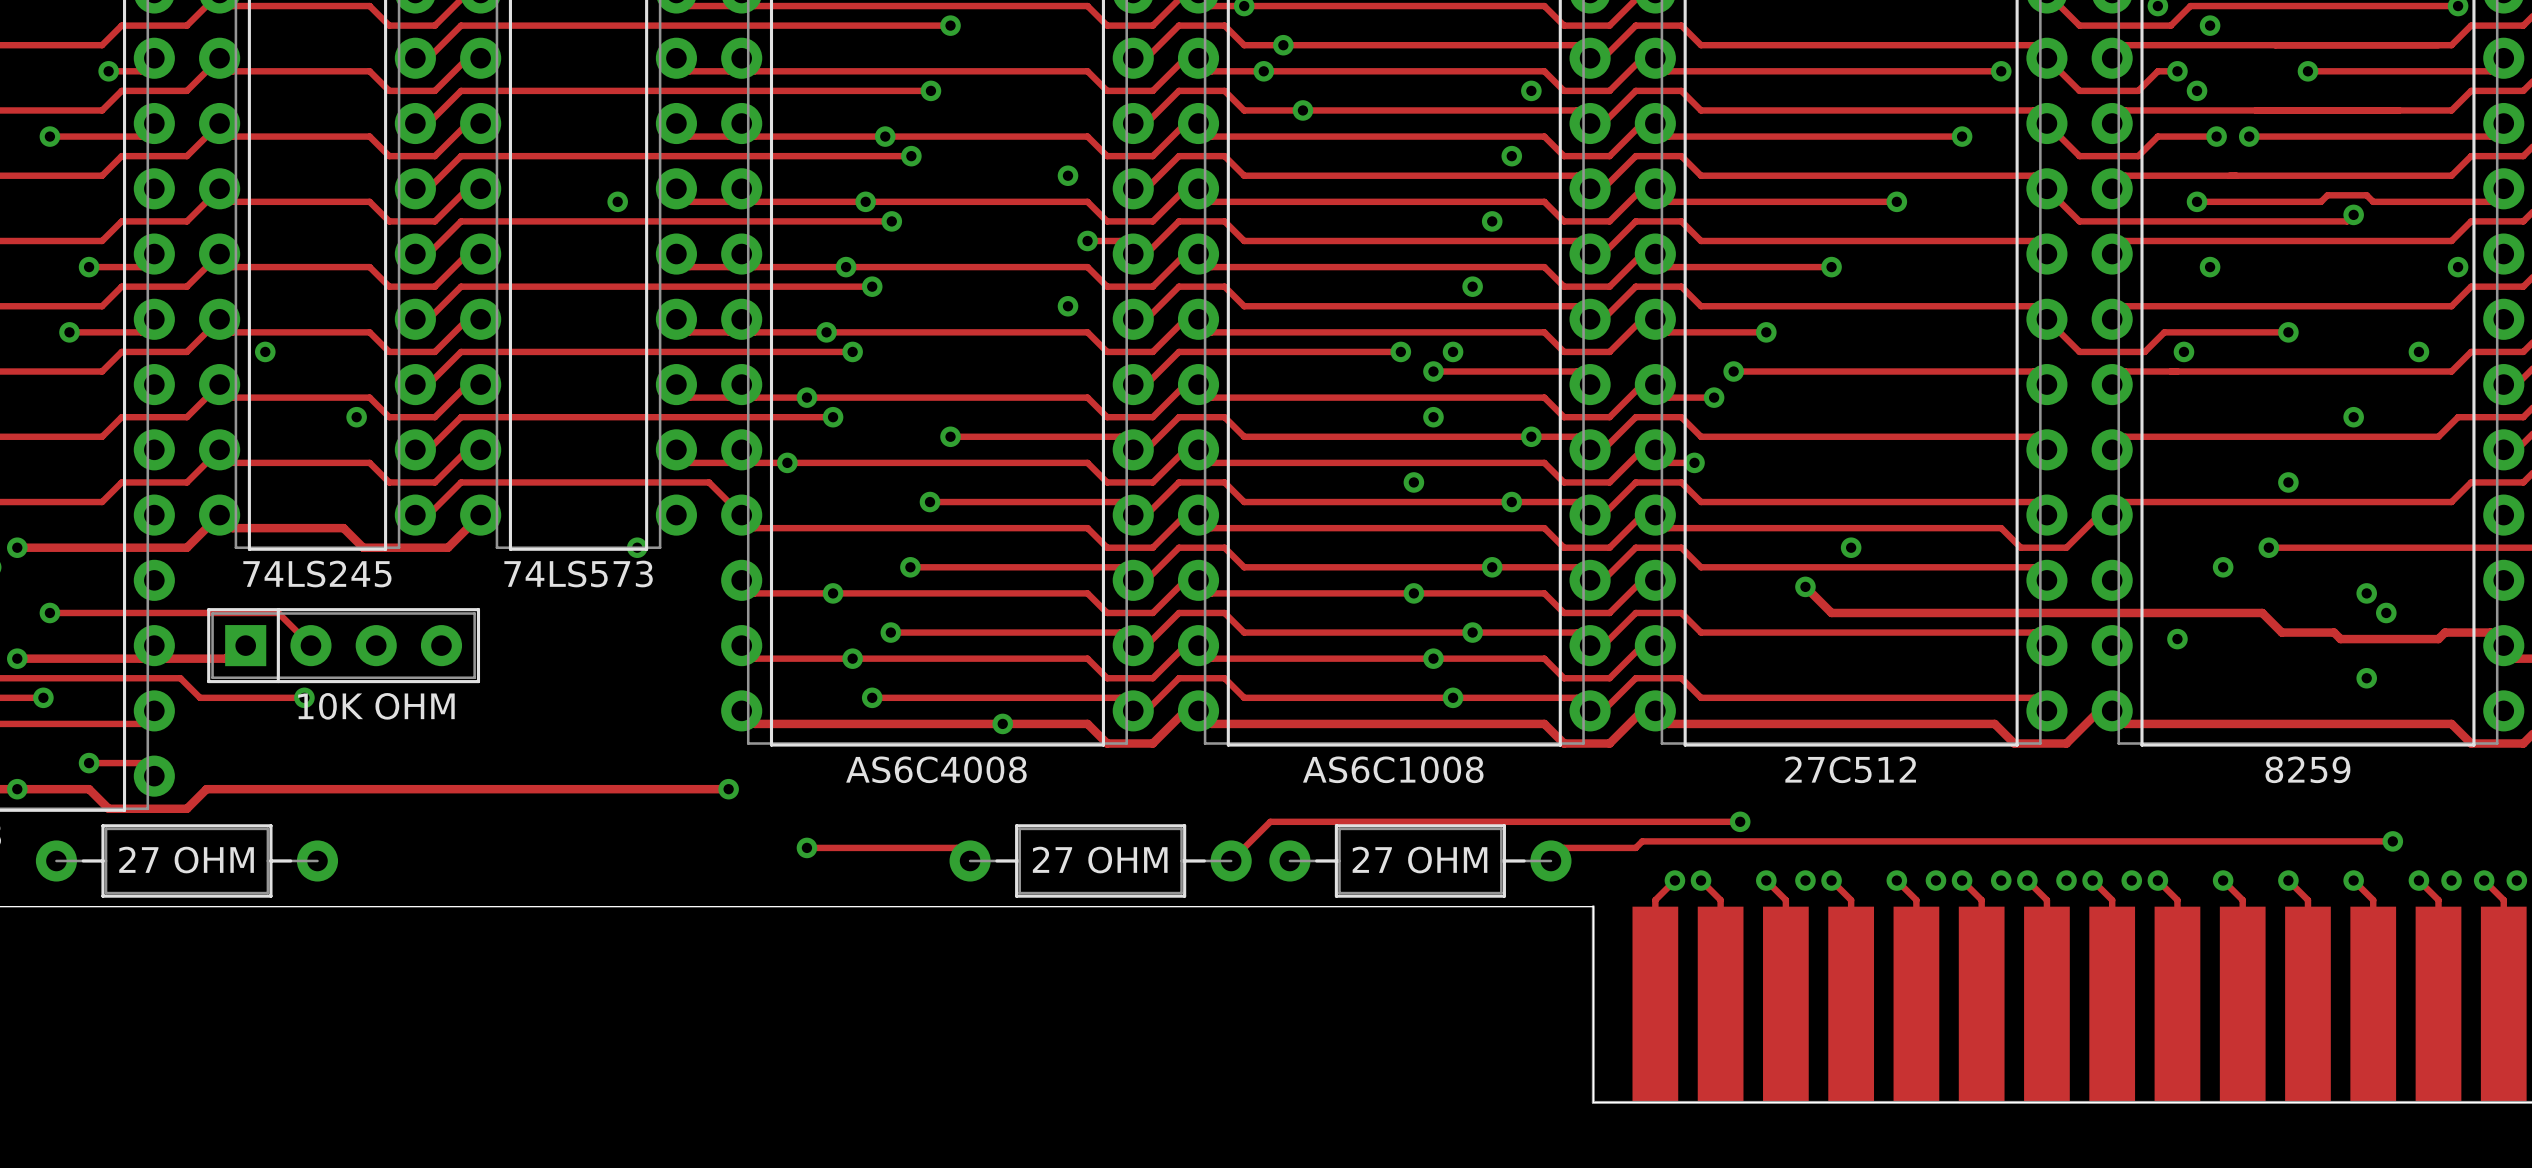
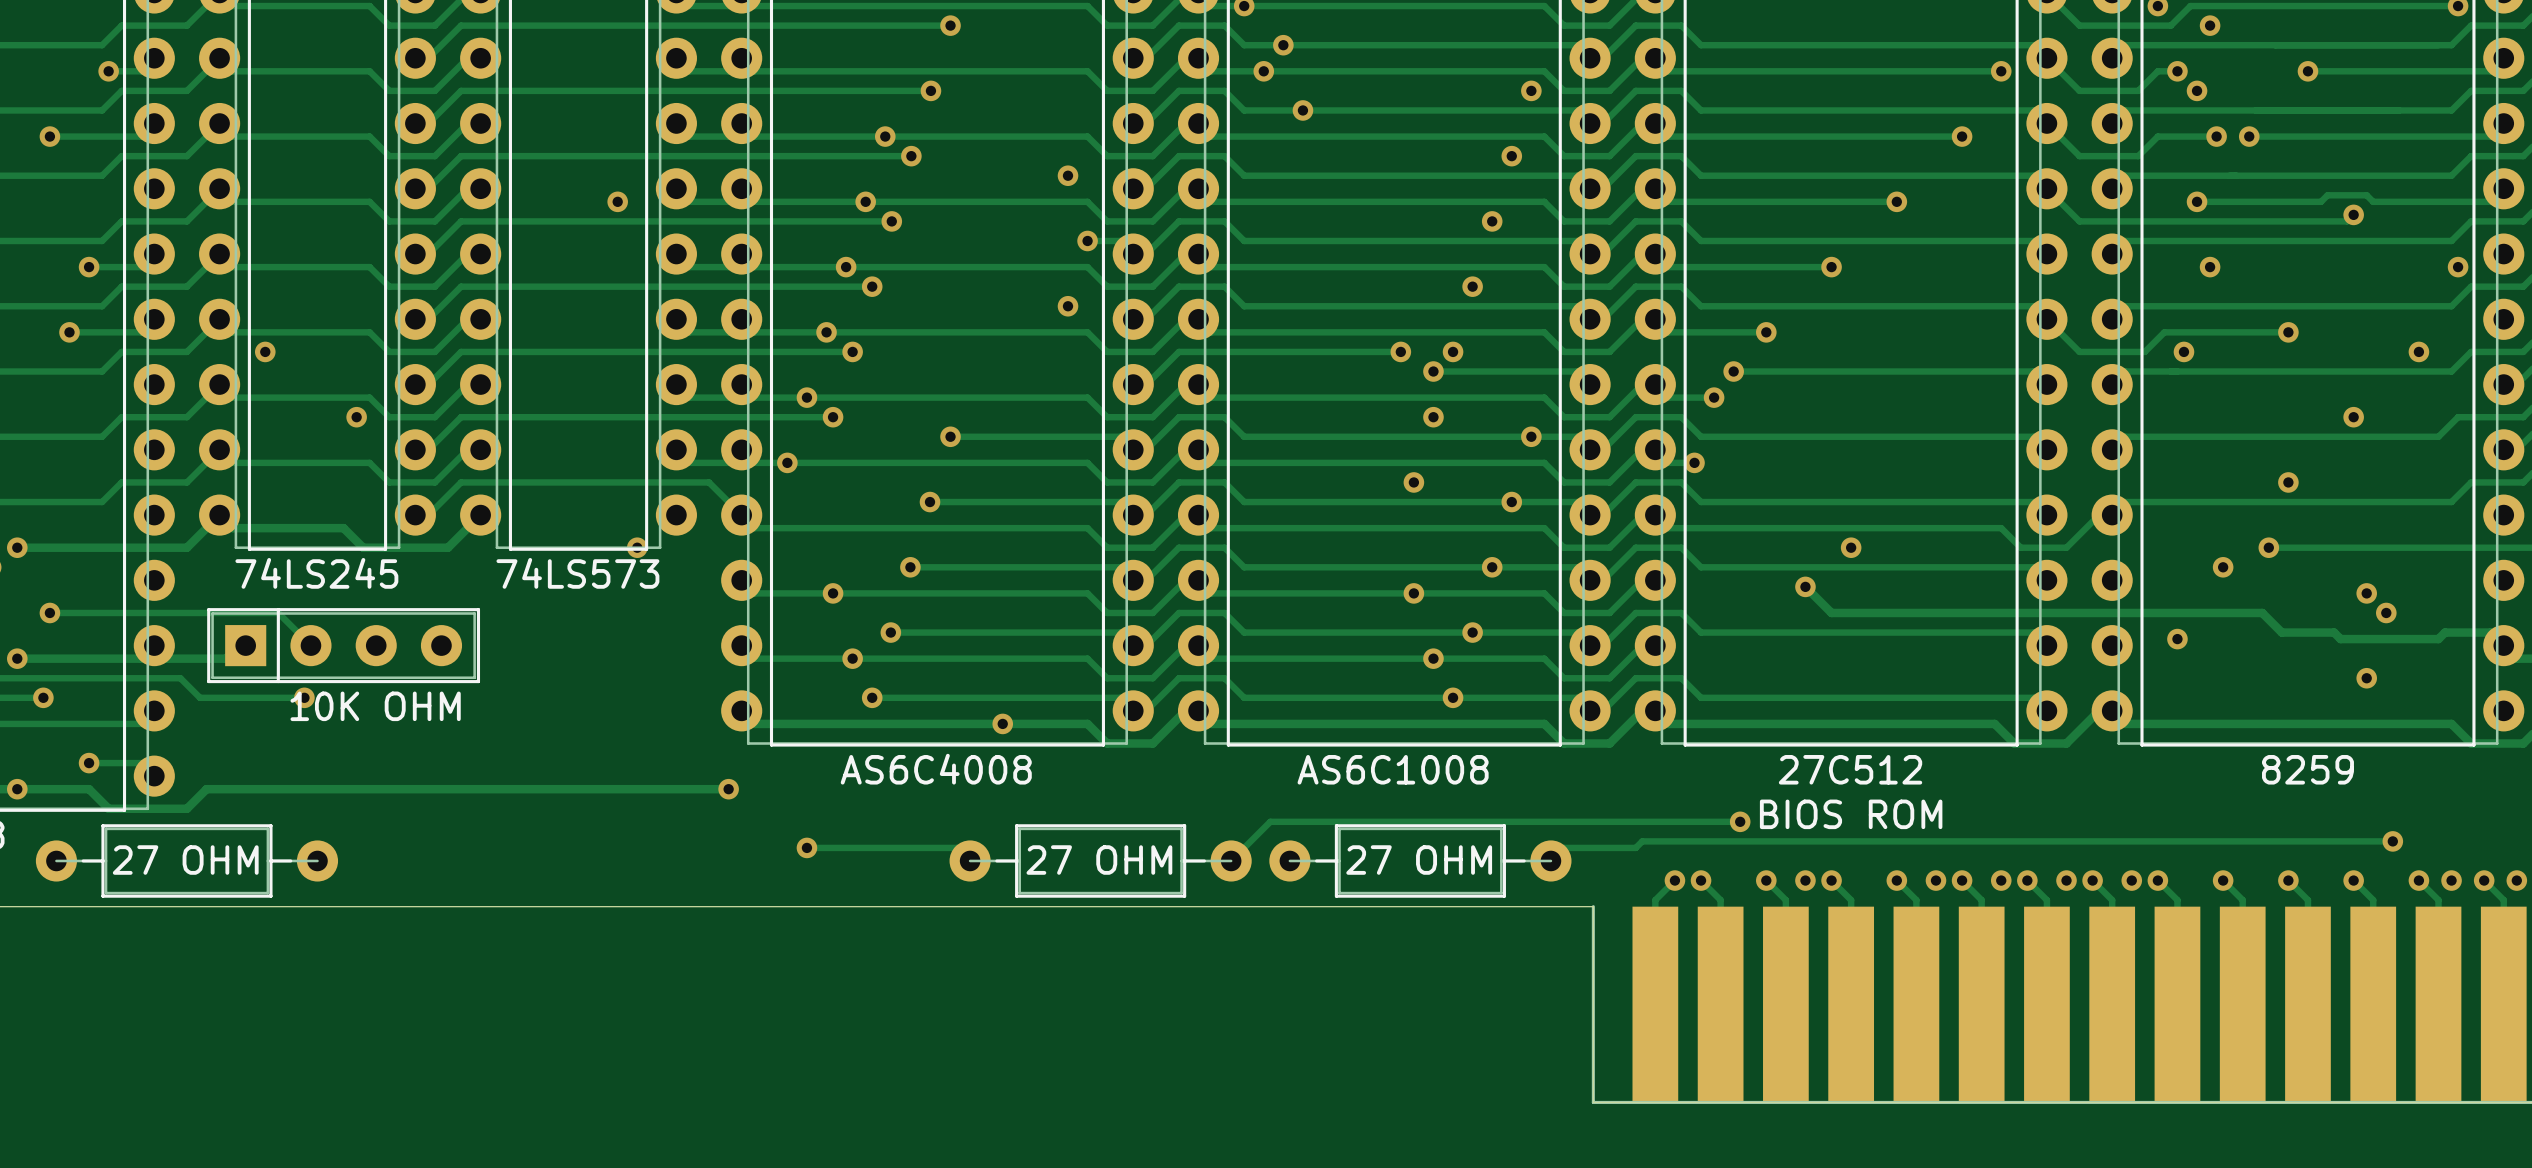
text: none -> BIOS ROM (1851, 814)

